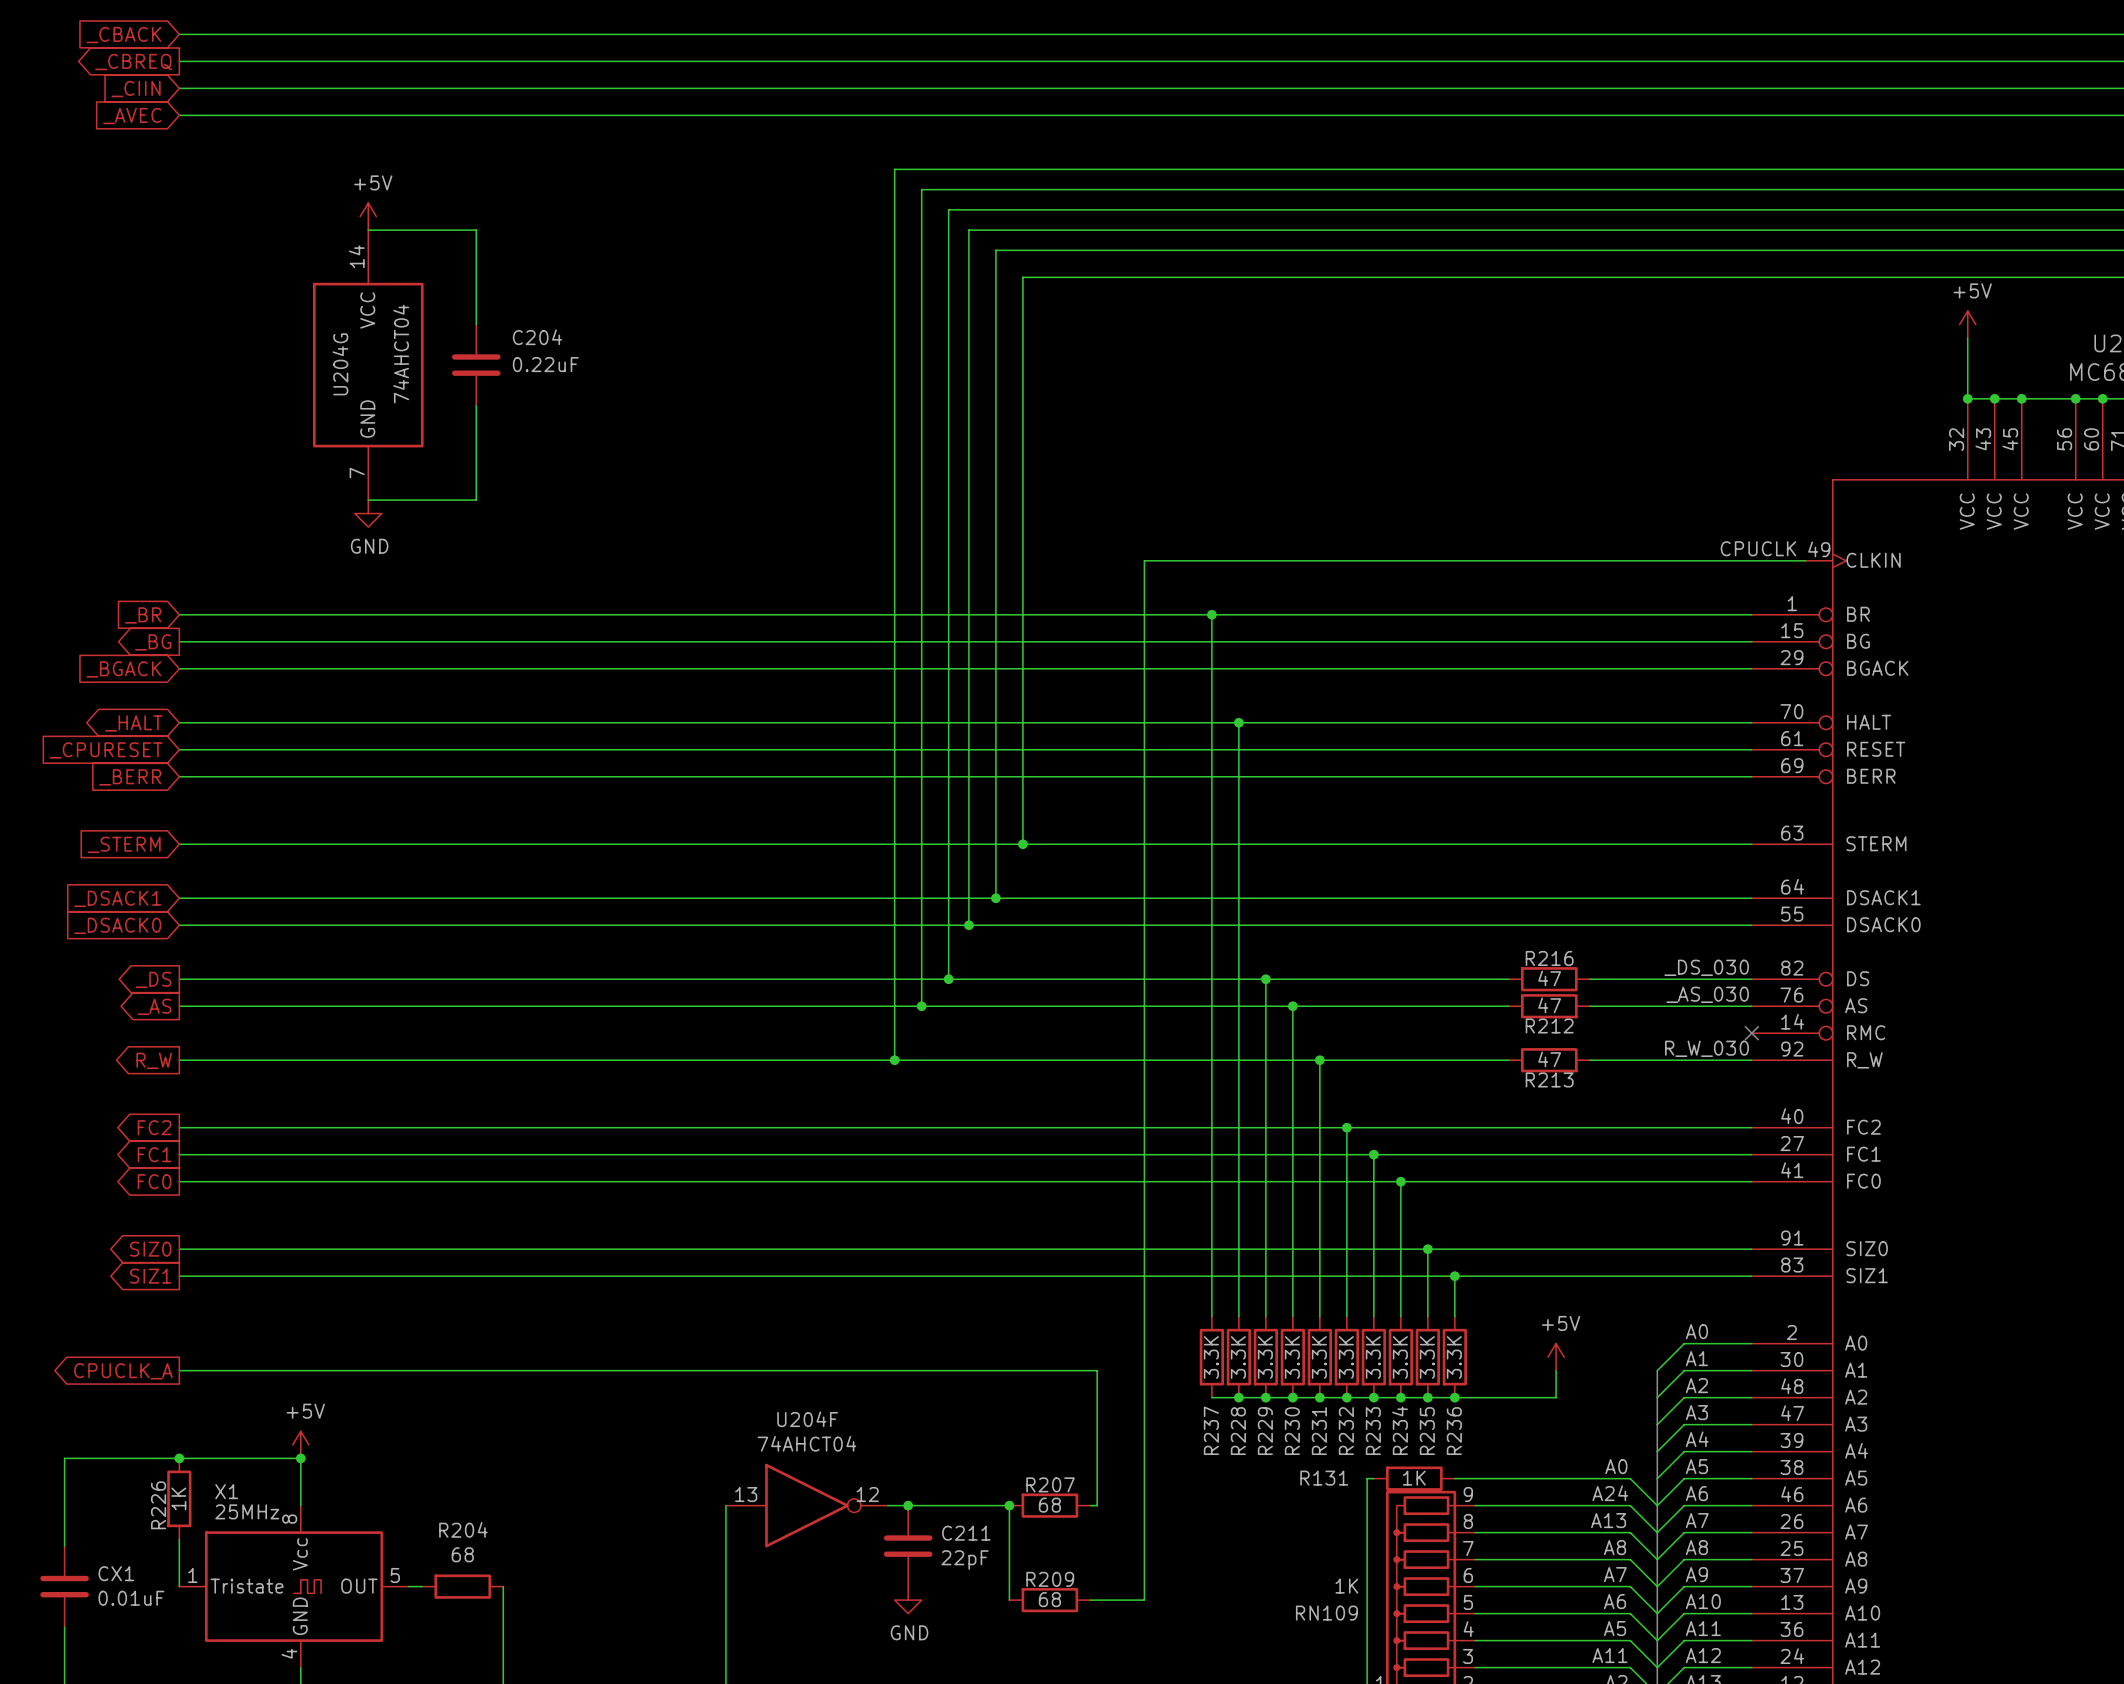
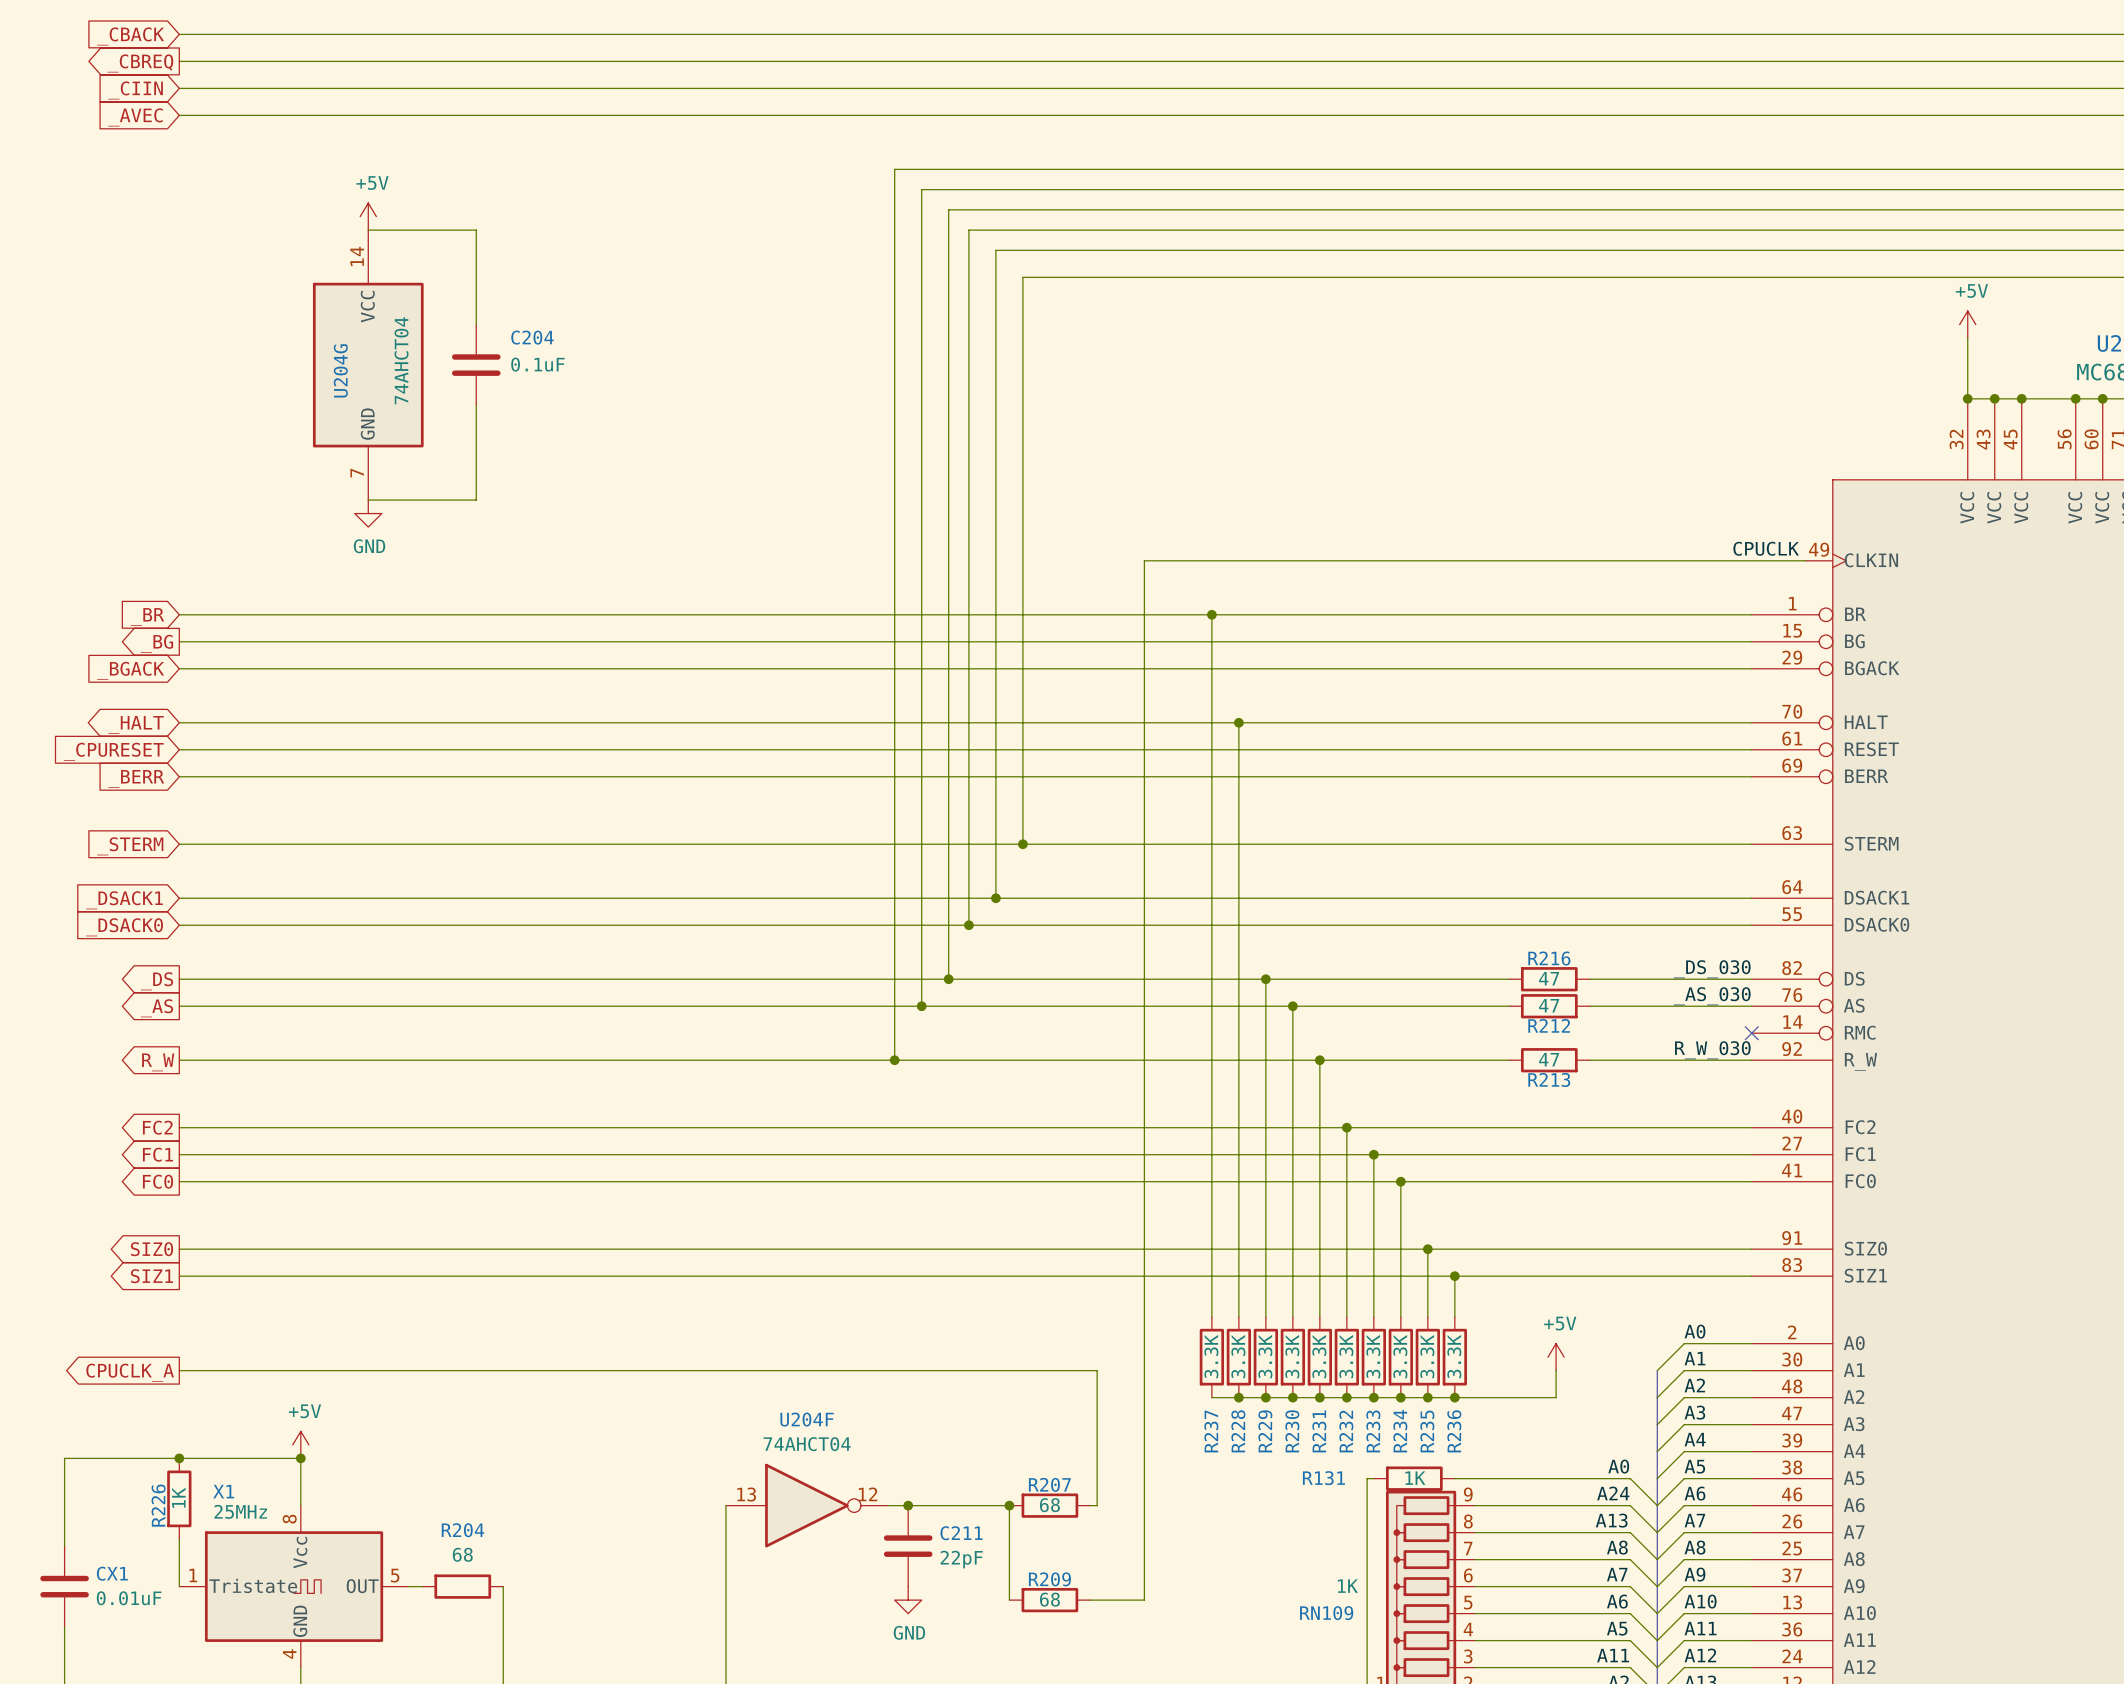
C204 value: 0.22uF (545, 364) -> 0.1uF (537, 364)

